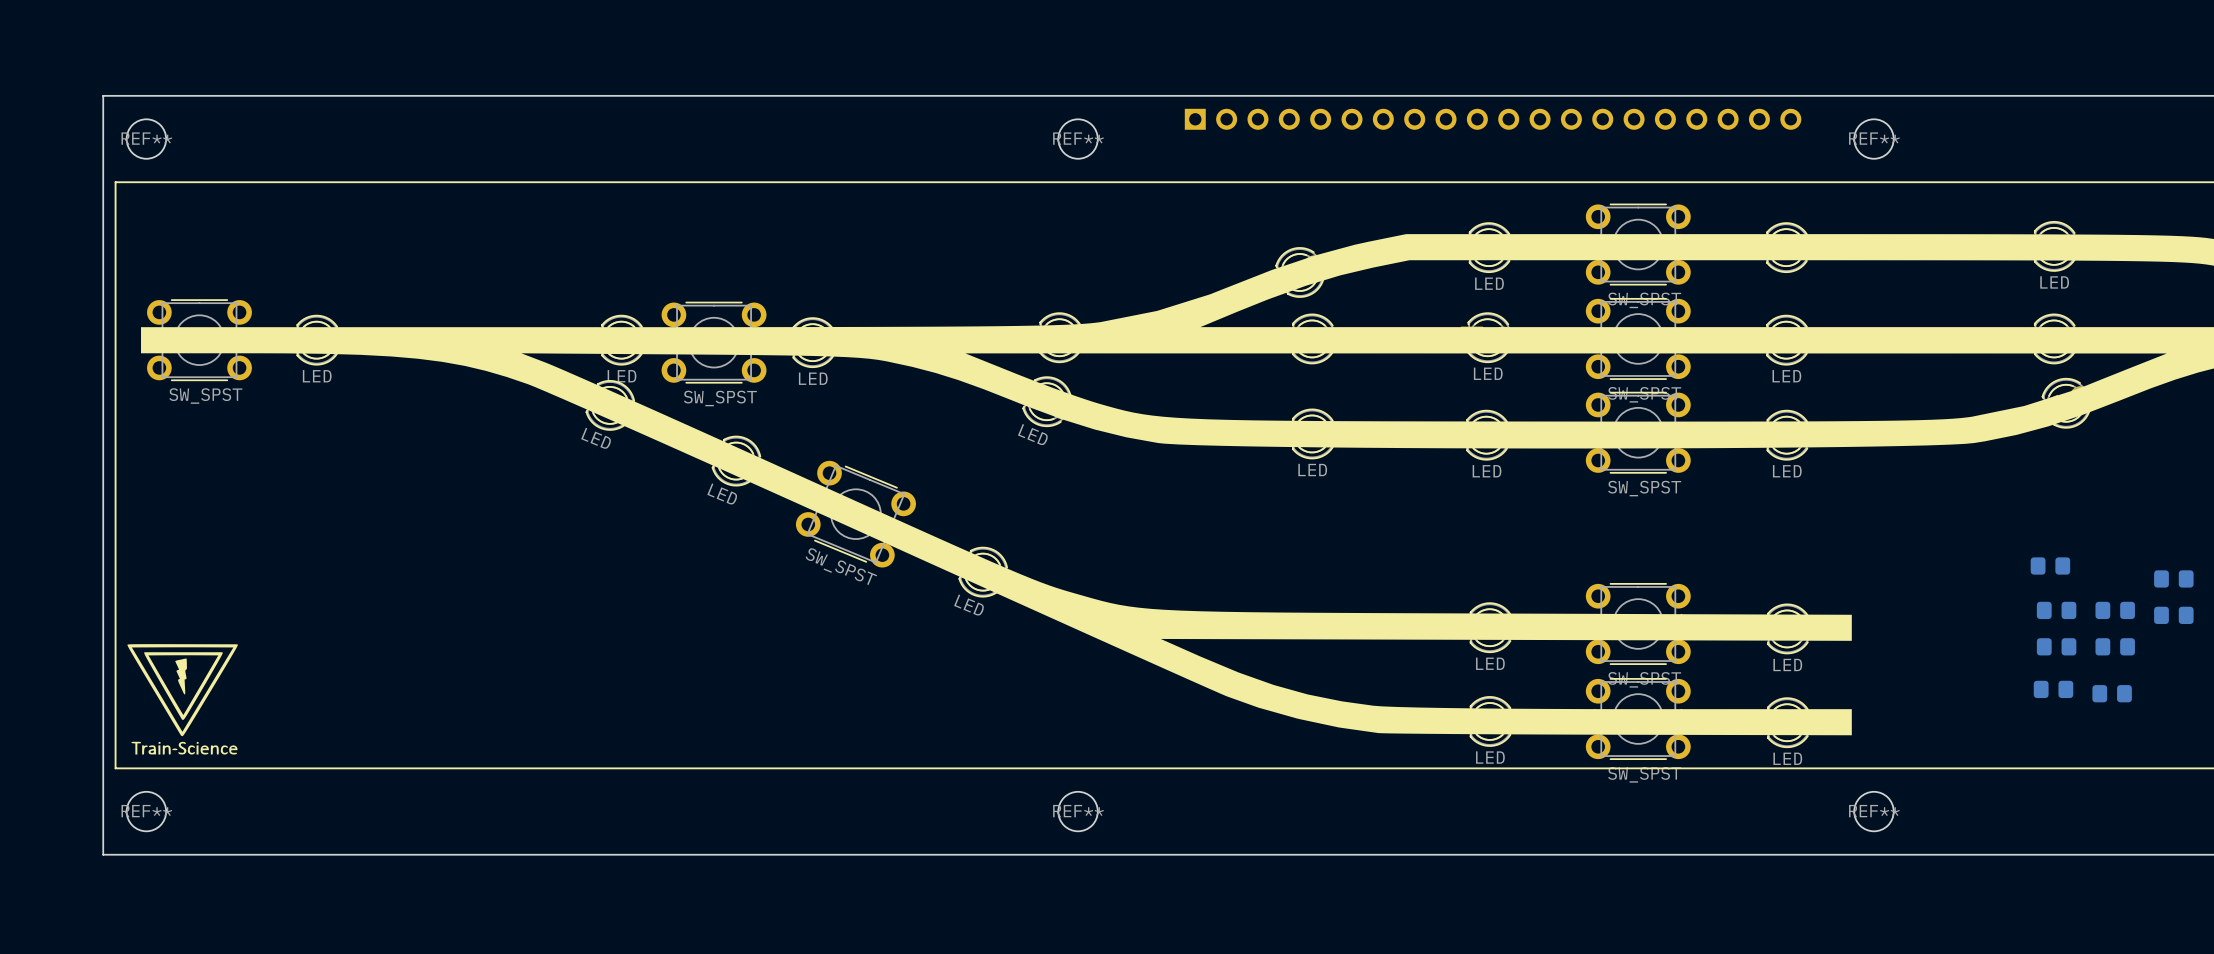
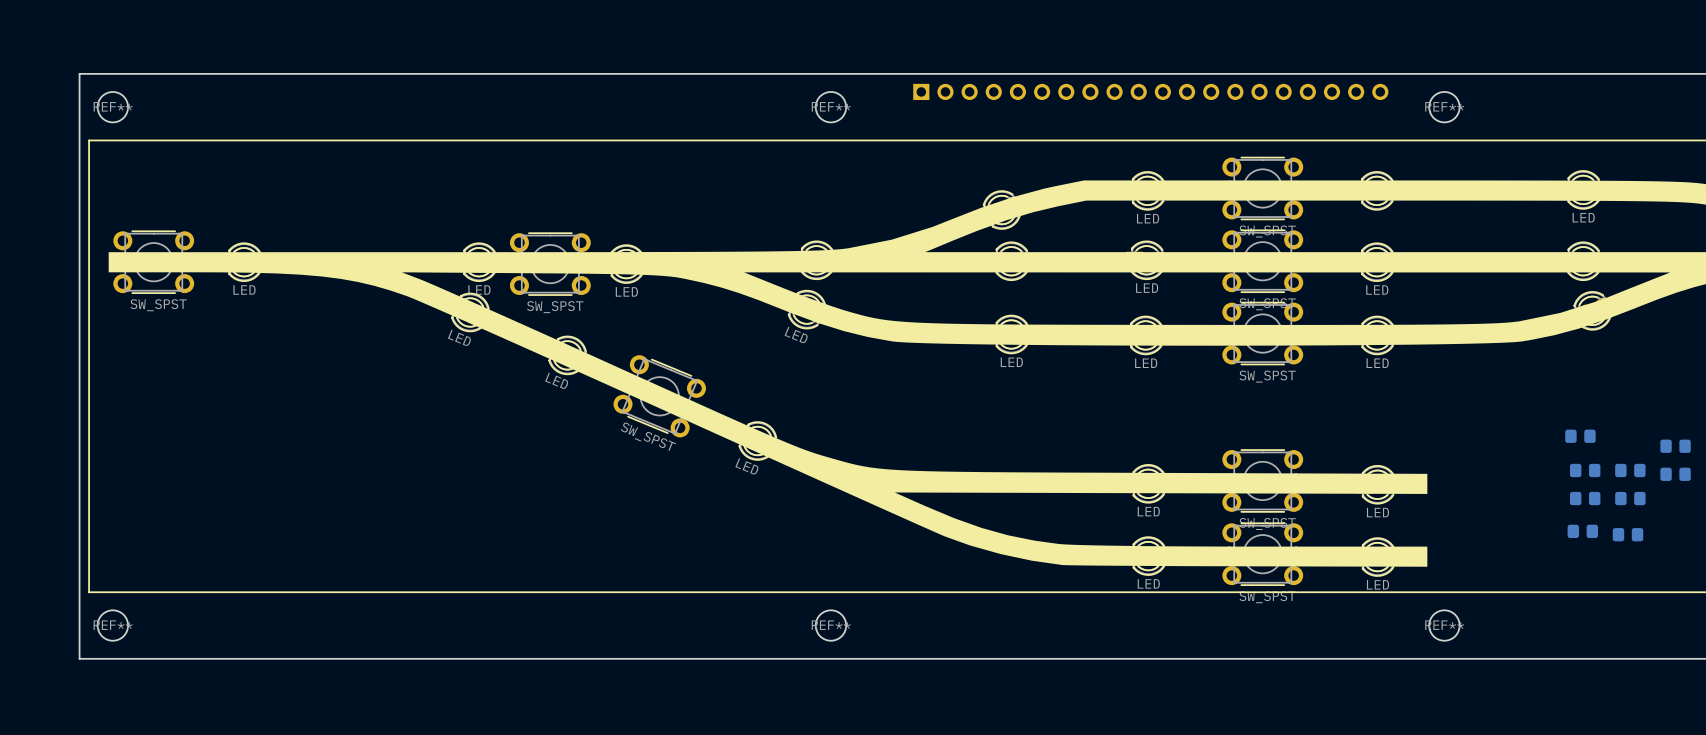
drawing: [127, 644, 238, 755] -> none

